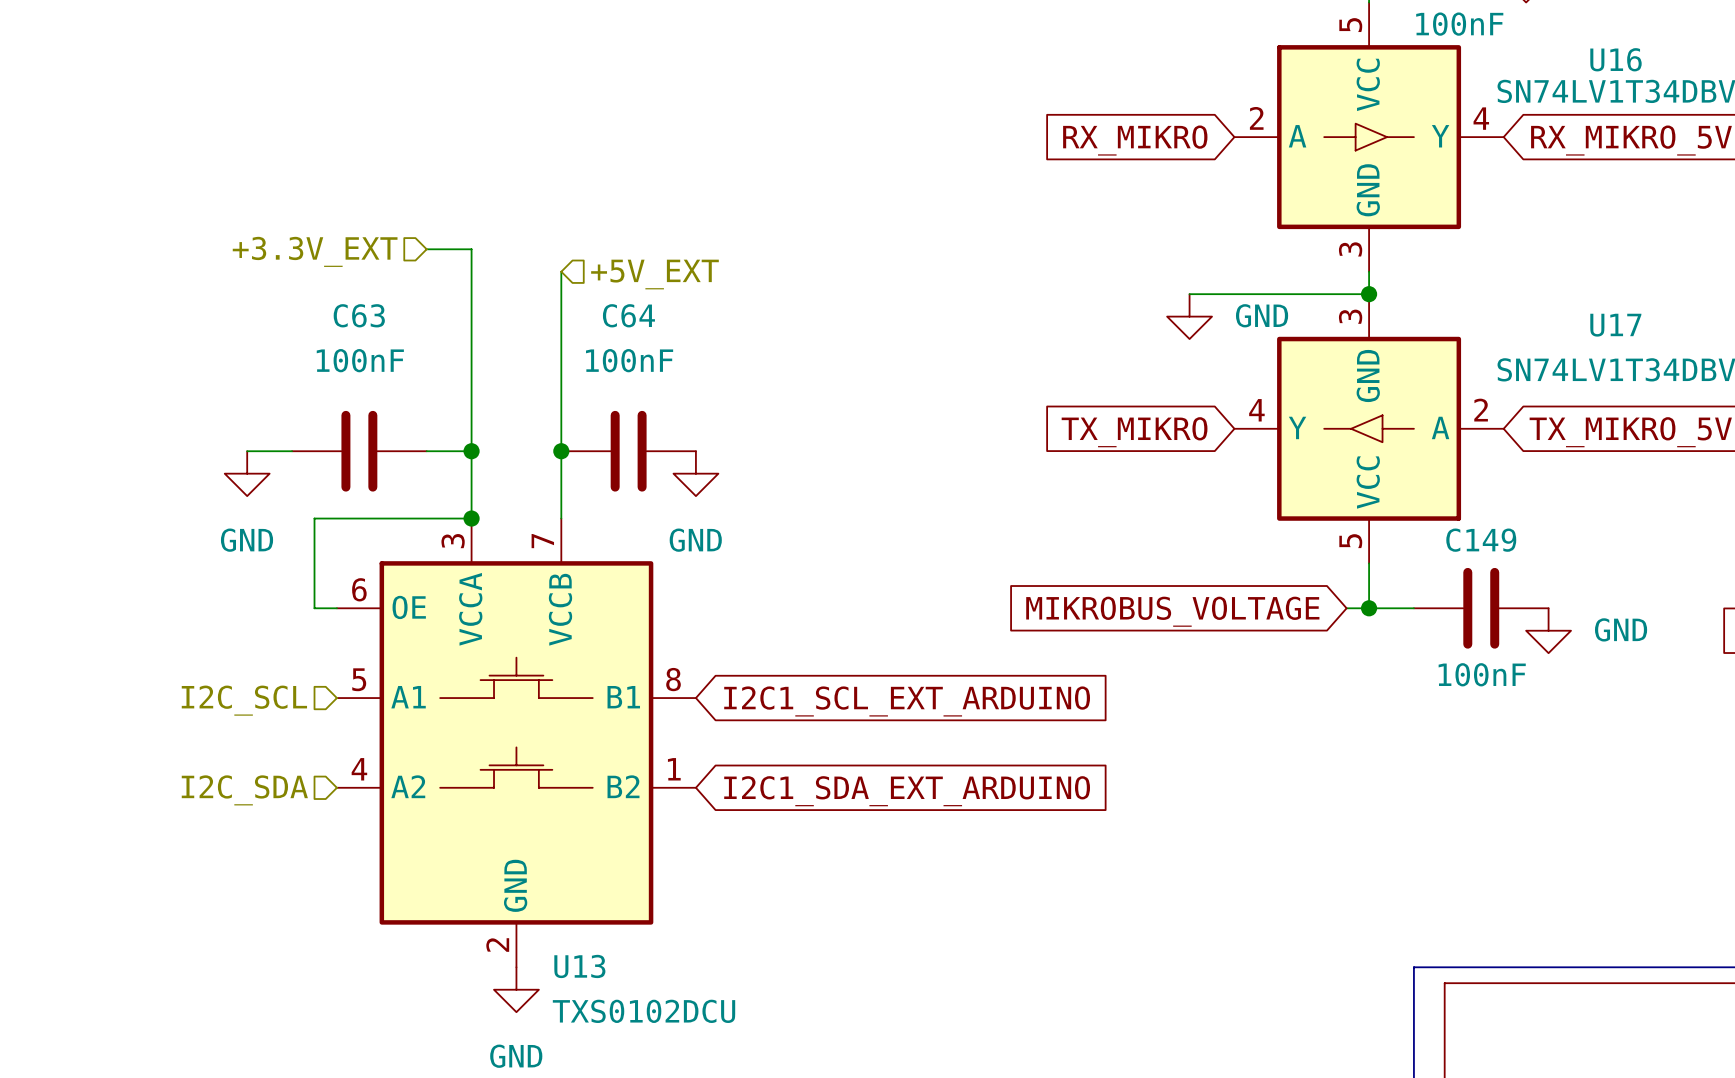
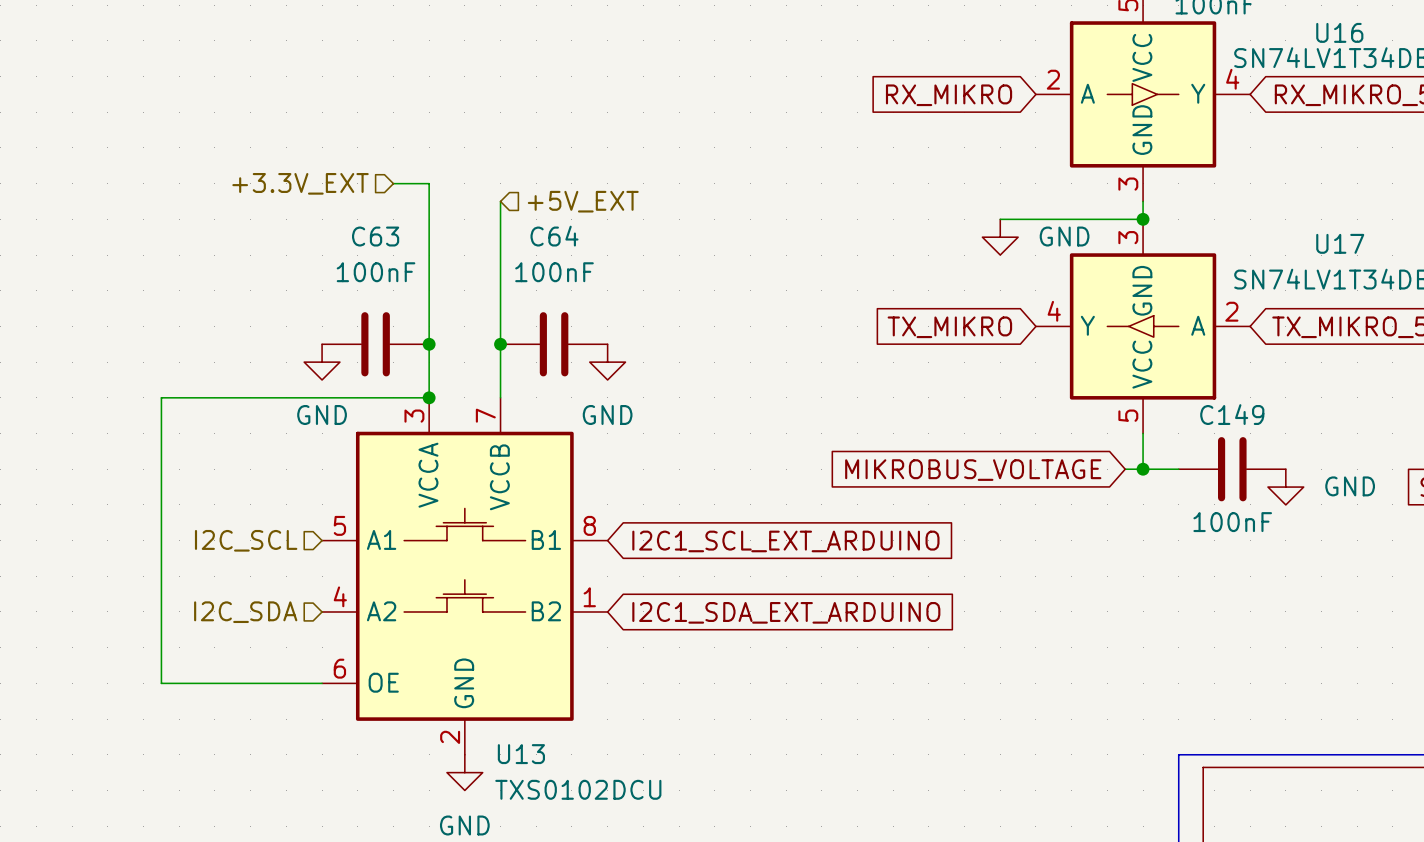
wire: (247, 451) (292, 451) -> none
C63 position: (359, 451) -> (375, 344)
power symbol position: GND (247, 473) -> GND (322, 362)
wire: (314, 518) (314, 608) (336, 608) -> (304, 397) (161, 397) (161, 683) (322, 683)
U13 symbol: [336, 518, 696, 968] -> [322, 397, 608, 755]

